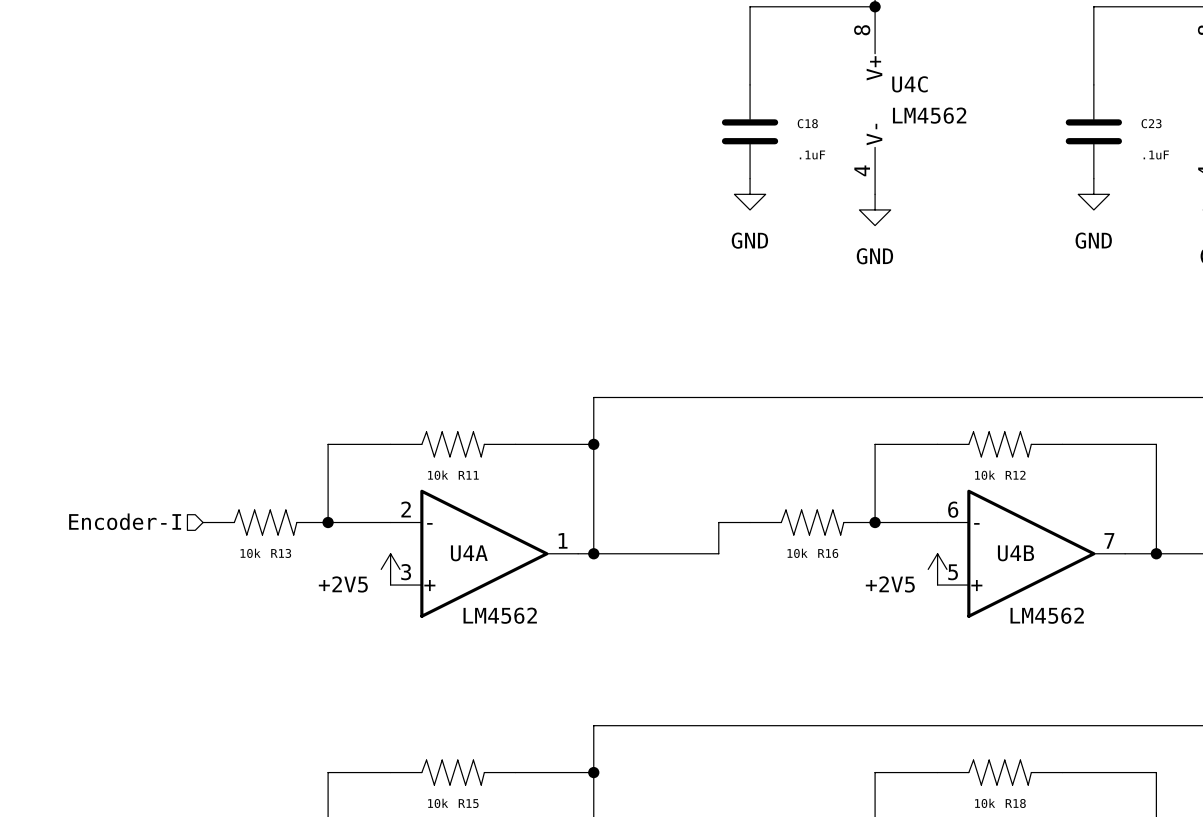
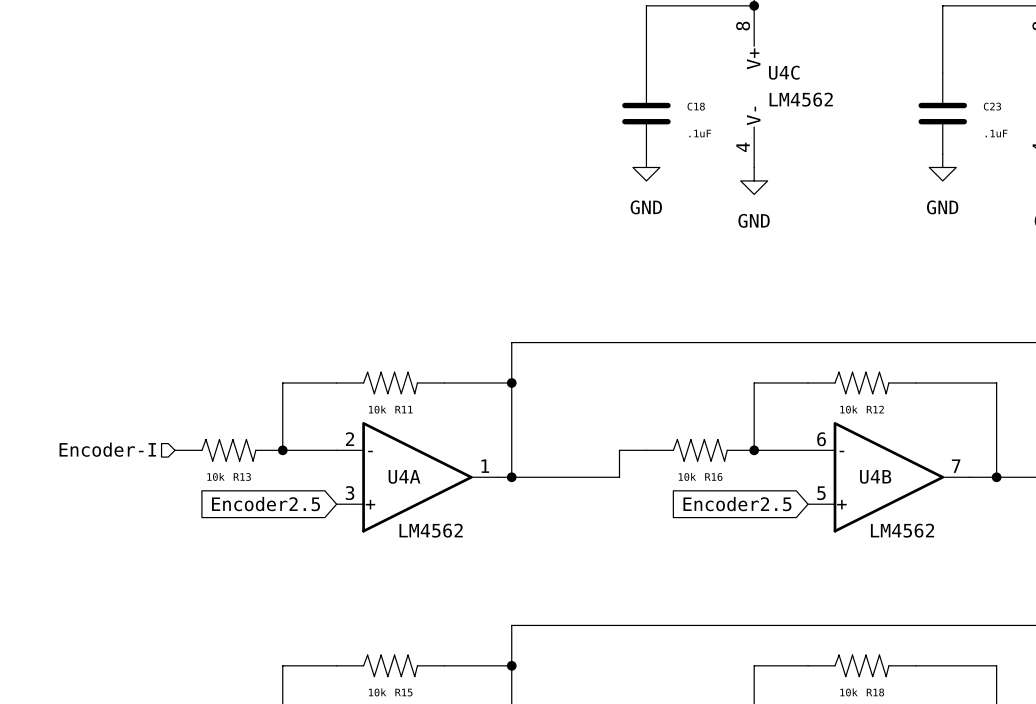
power symbol: +2V5 (390, 569) -> none
power symbol: +2V5 (937, 569) -> none
global label: none -> Encoder2.5 (266, 504)
global label: none -> Encoder2.5 (737, 504)

